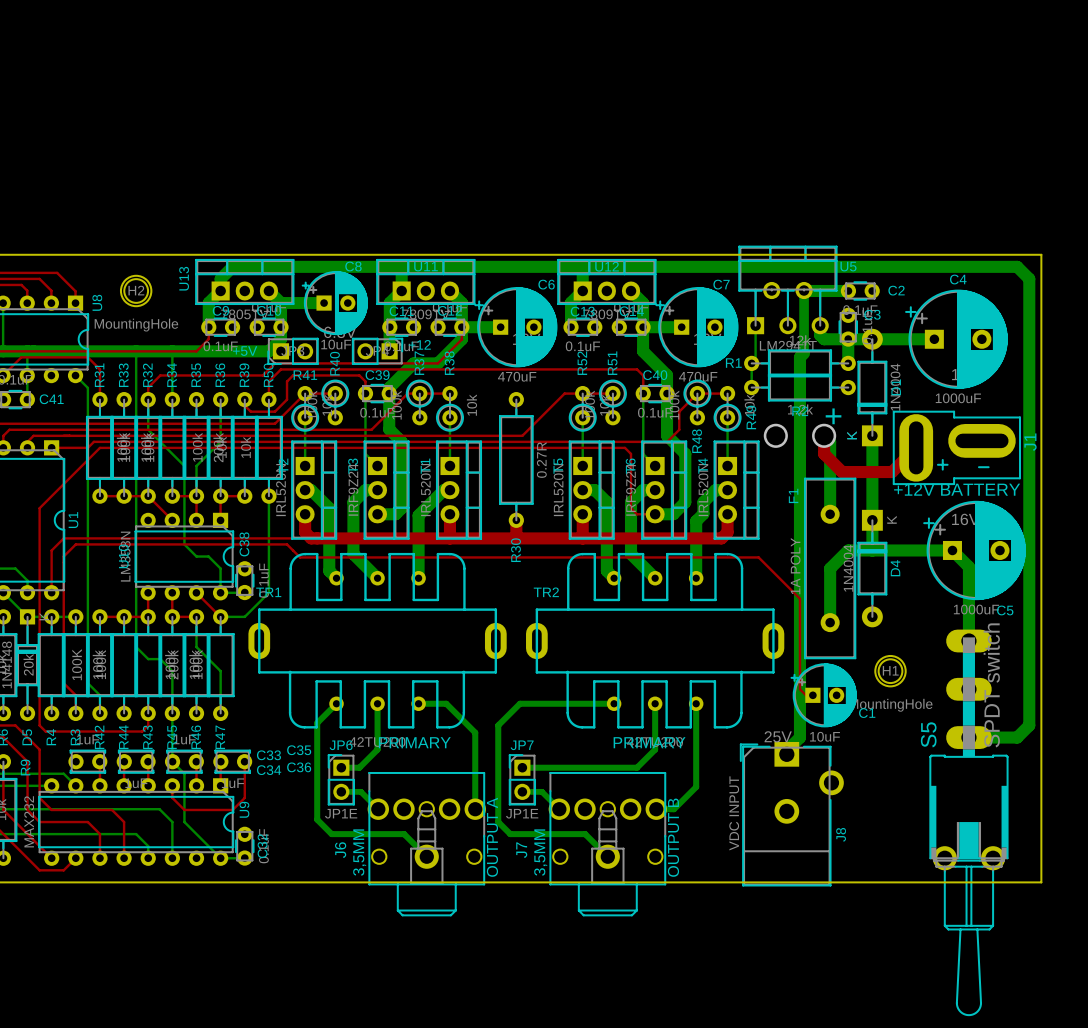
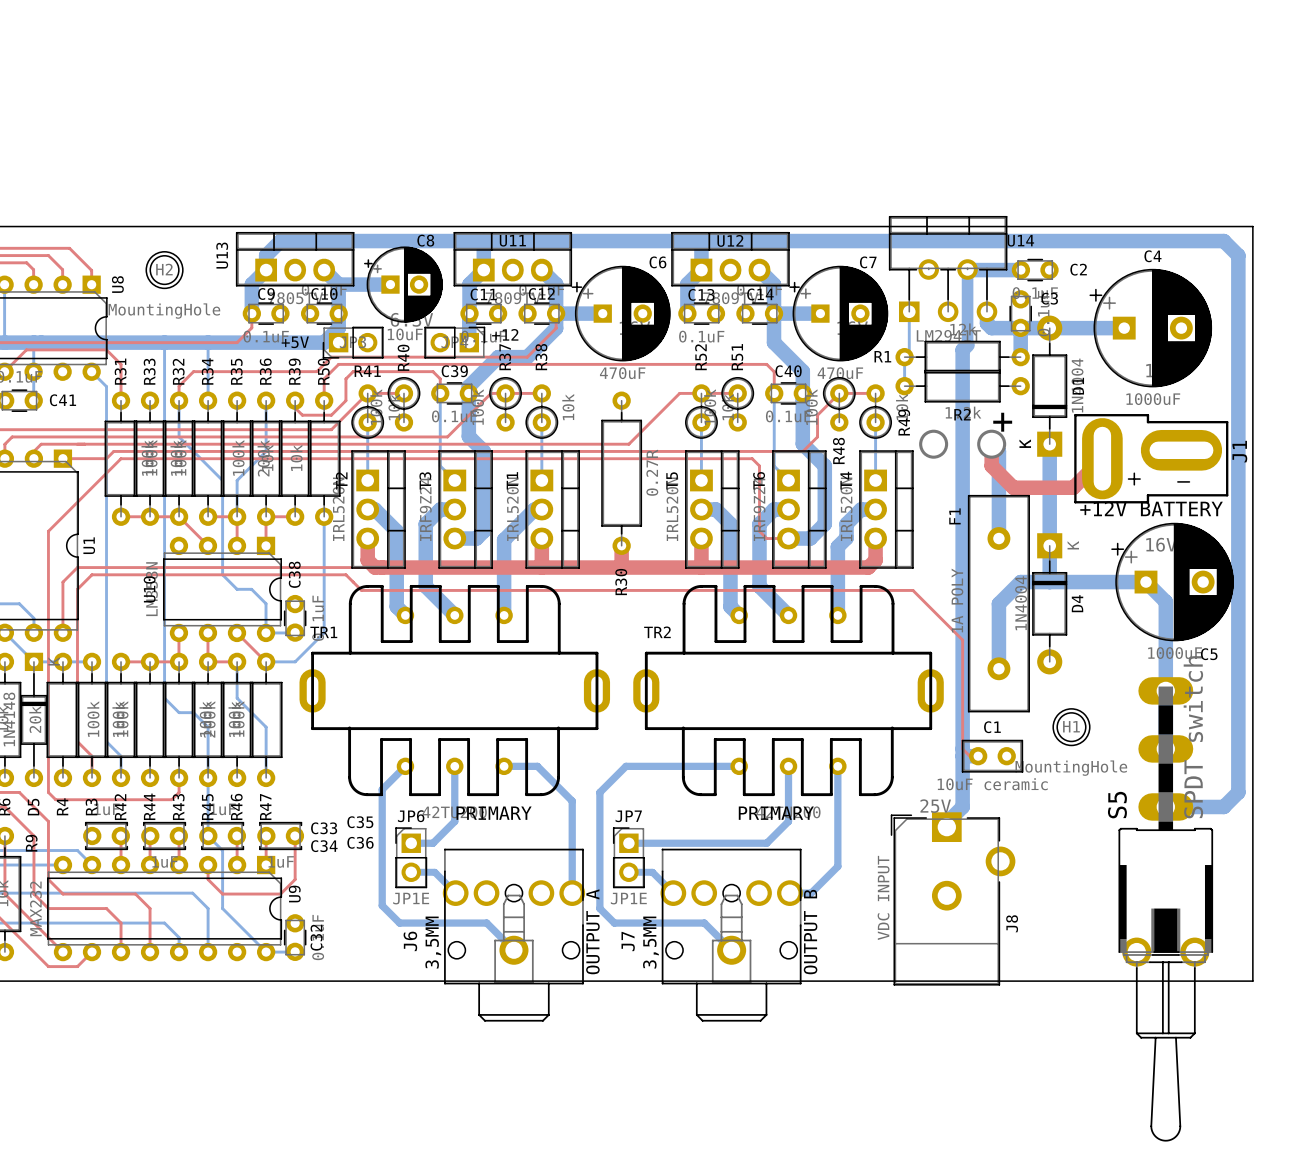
U5 name: U5 (848, 266) -> U14 (1020, 240)
C1 footprint: [790, 663, 857, 727] -> [961, 739, 1024, 773]
R42 value: 100K (77, 664) -> 100k (93, 719)
C1 name position: C1 (867, 713) -> C1 (992, 727)
C1 value: 10uF (825, 736) -> 10uF ceramic (992, 784)

